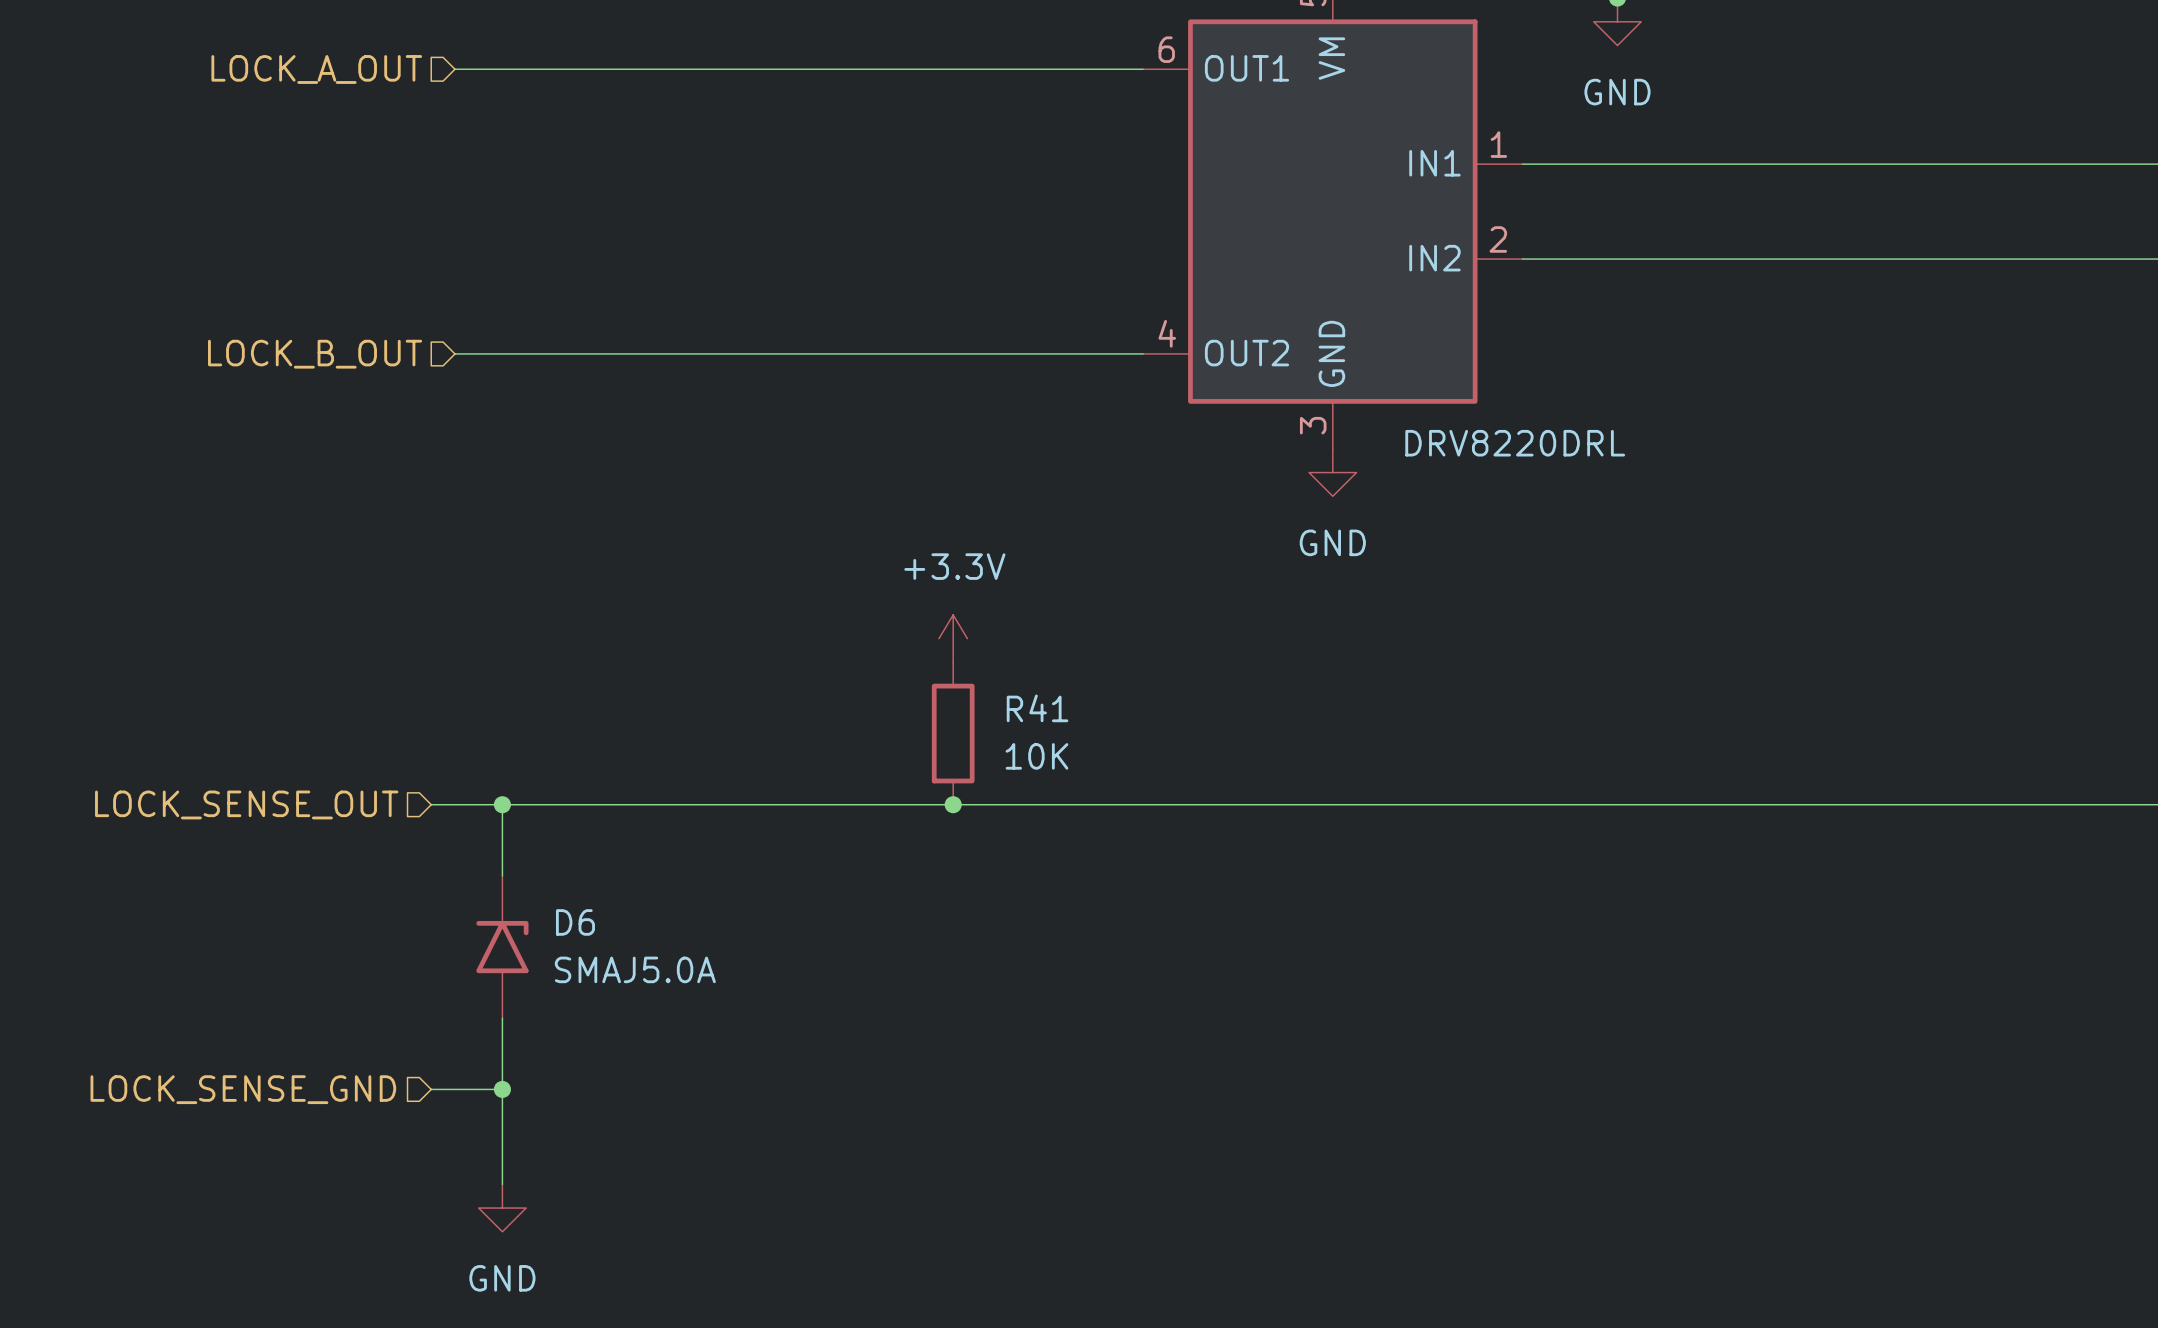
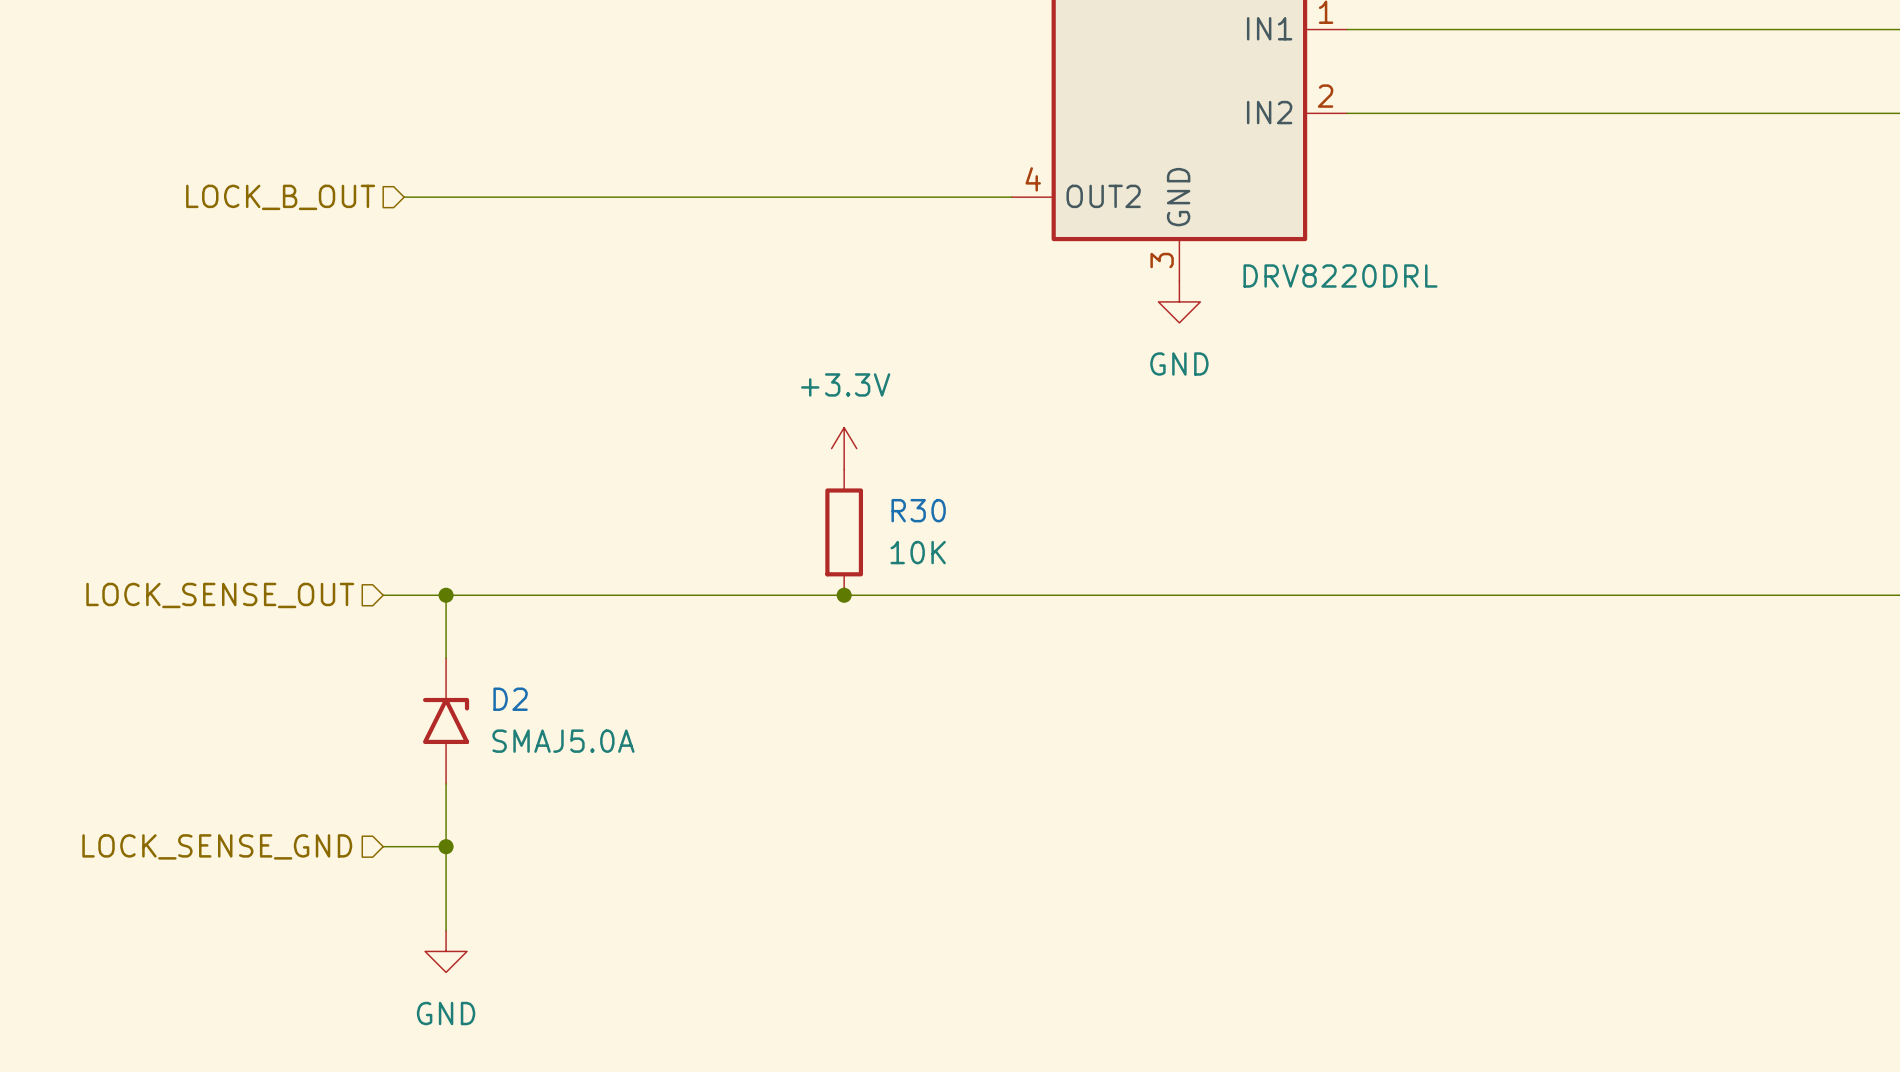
R41 name: R41 (1037, 708) -> R30 (918, 510)
D6 name: D6 (575, 922) -> D2 (510, 699)

